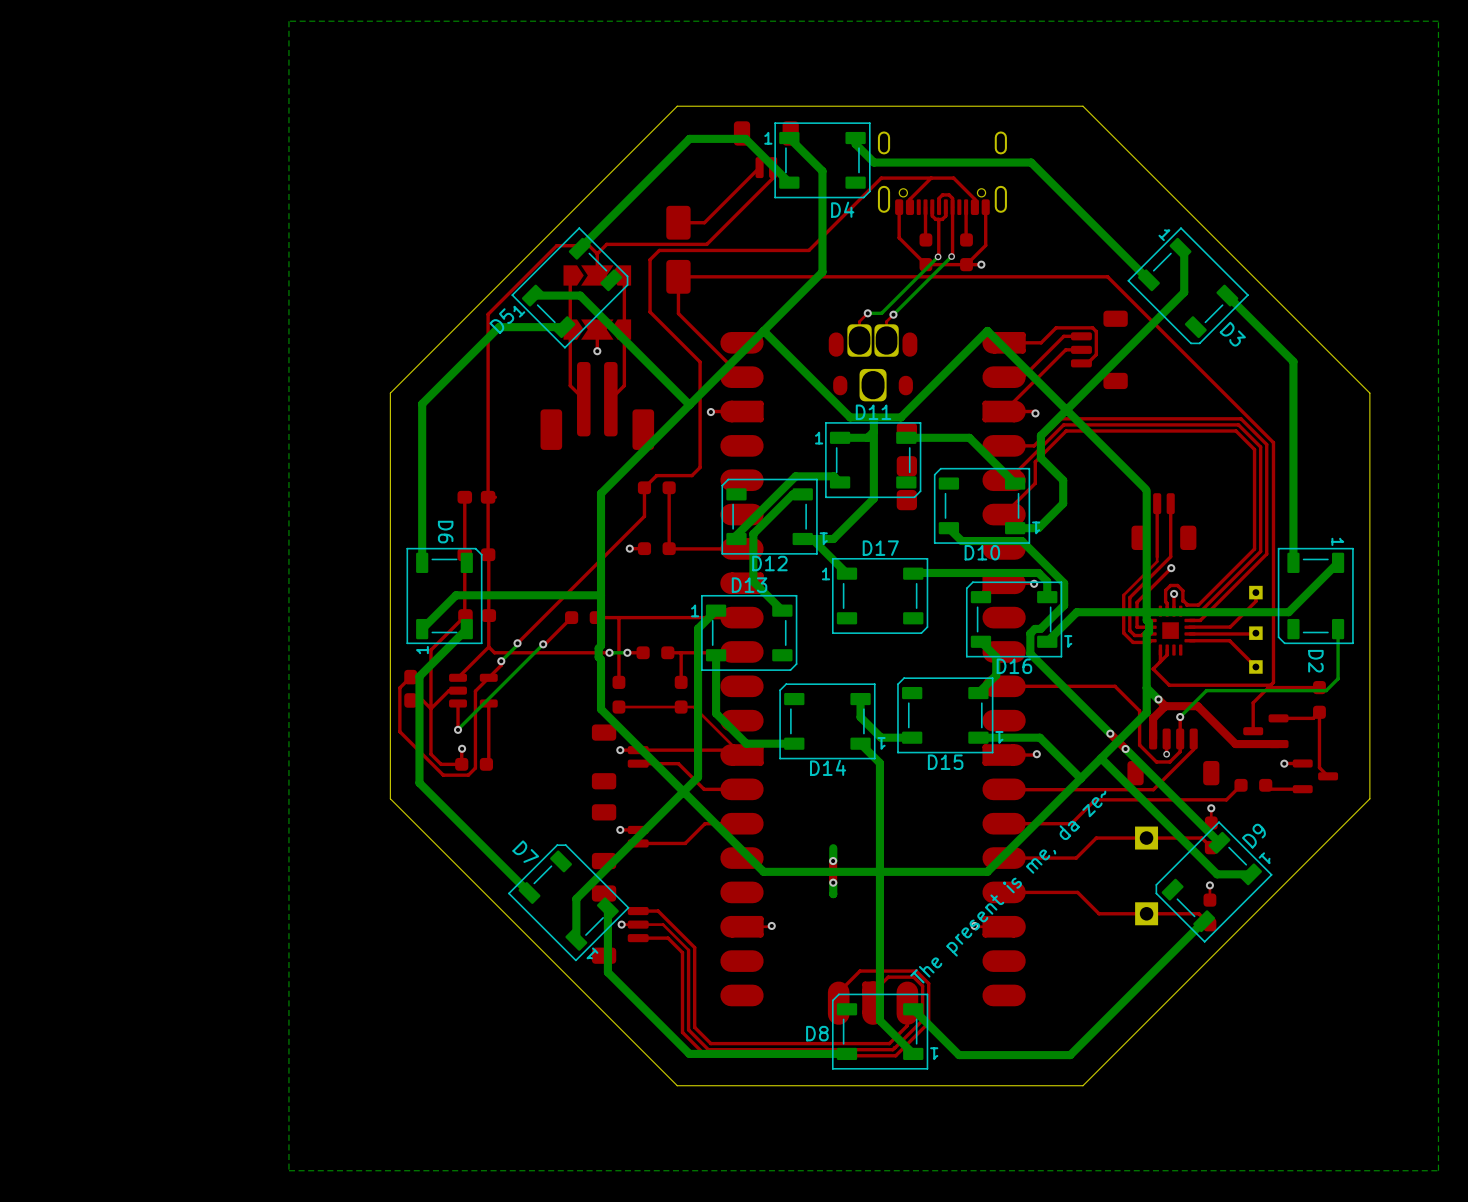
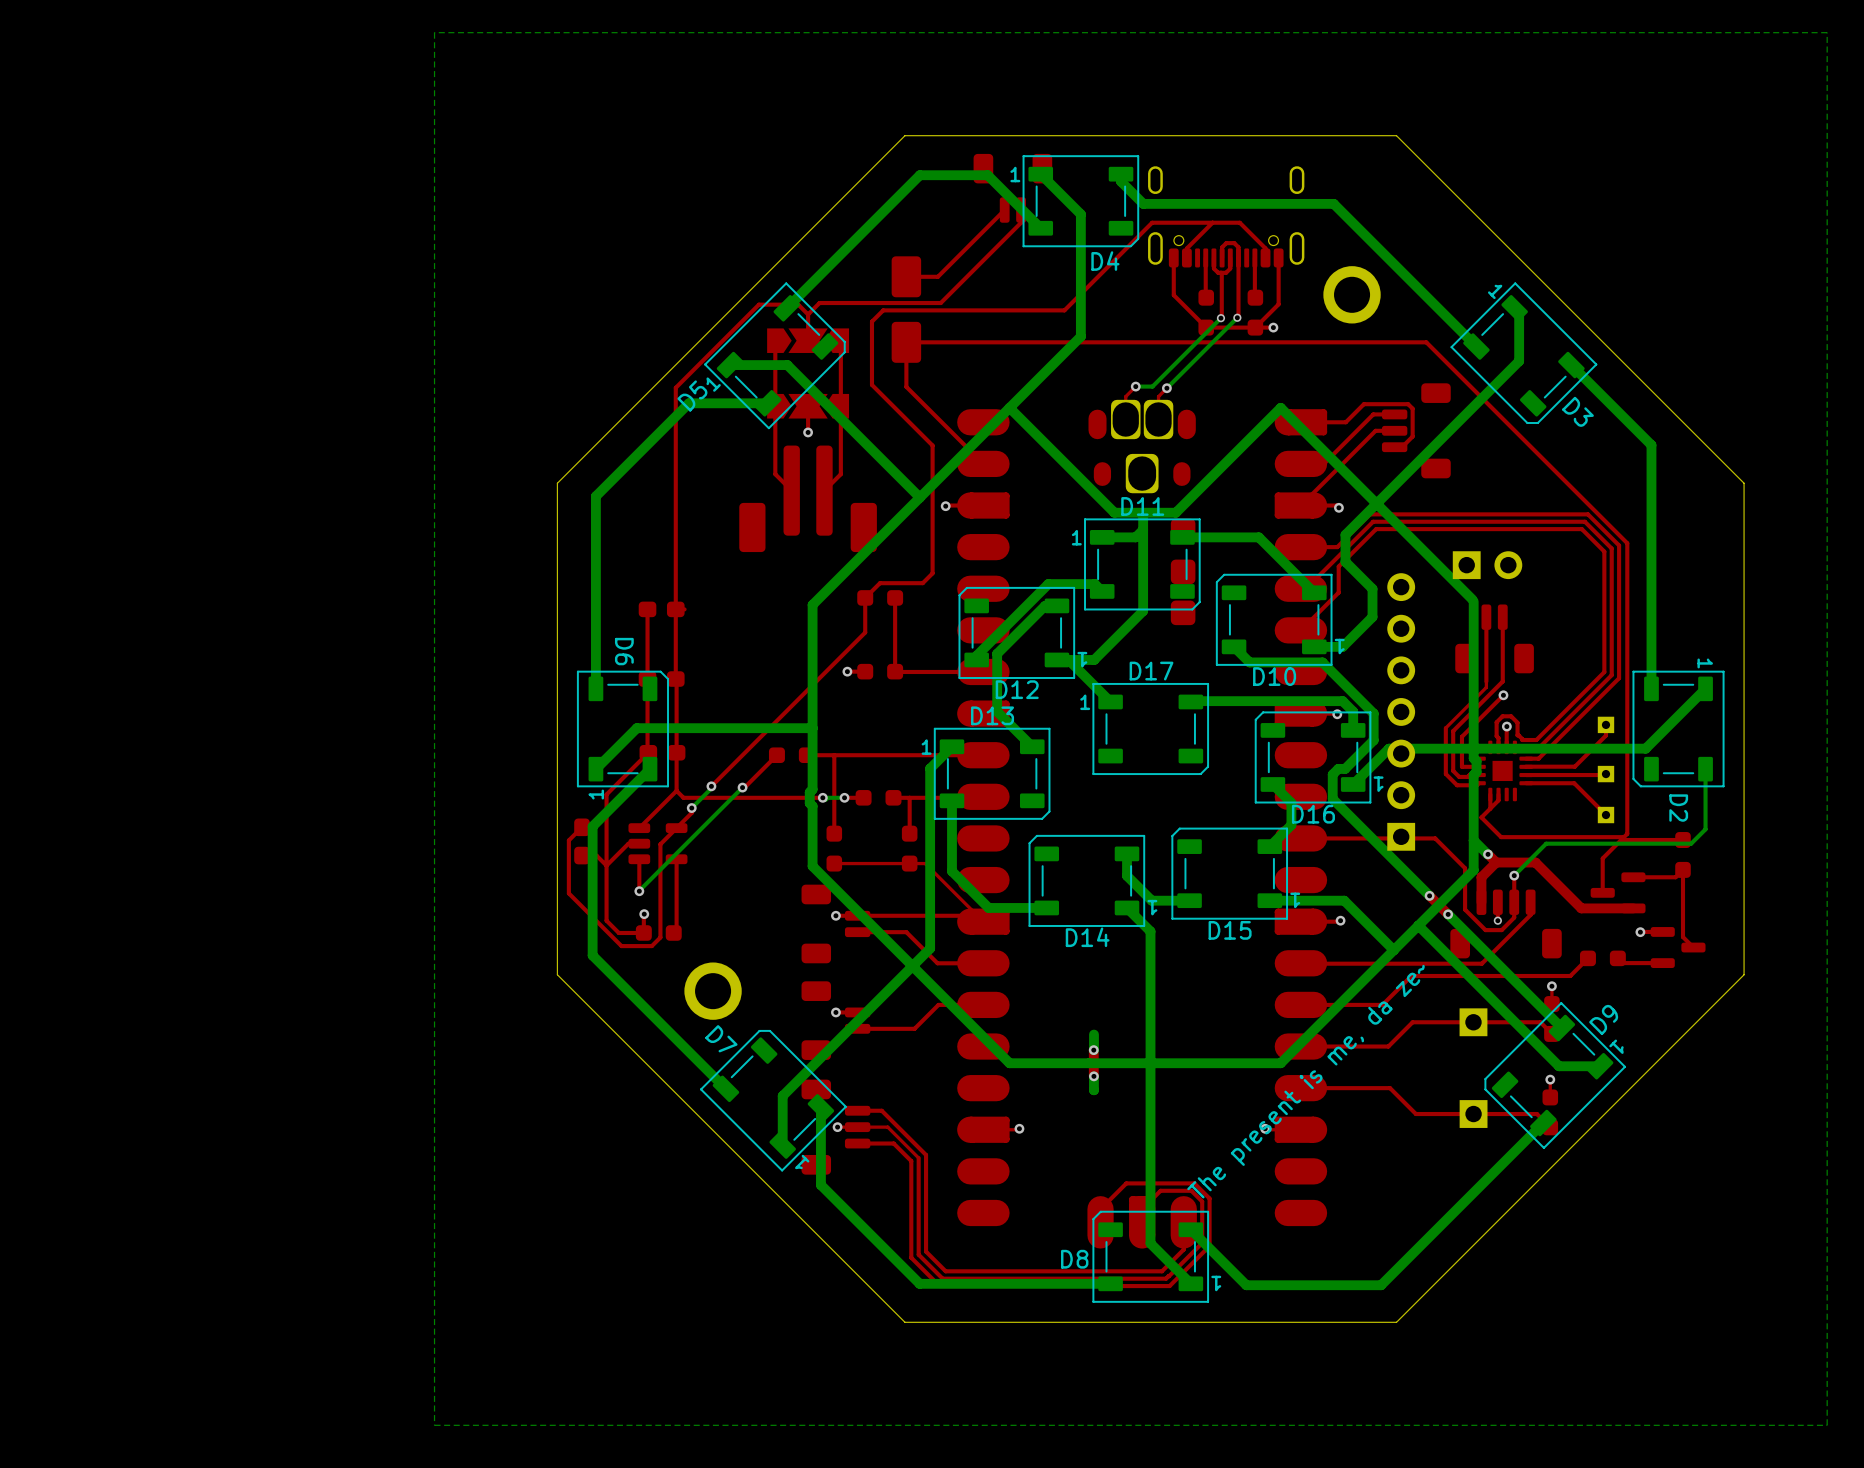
part: none -> (1352, 294)
part: none -> (1487, 565)
part: none -> (1401, 711)
part: none -> (713, 991)

